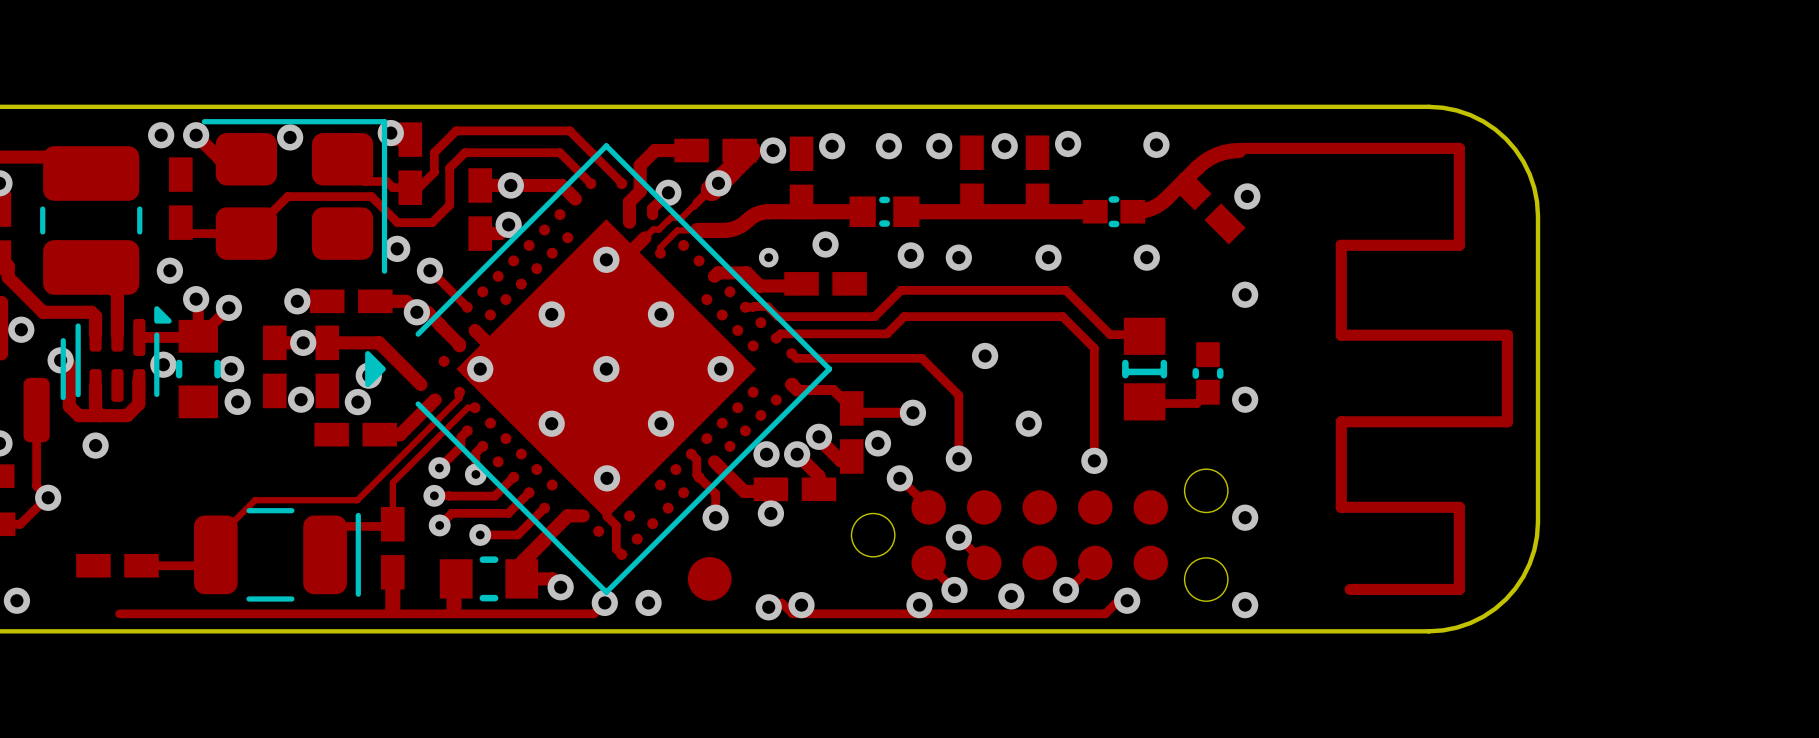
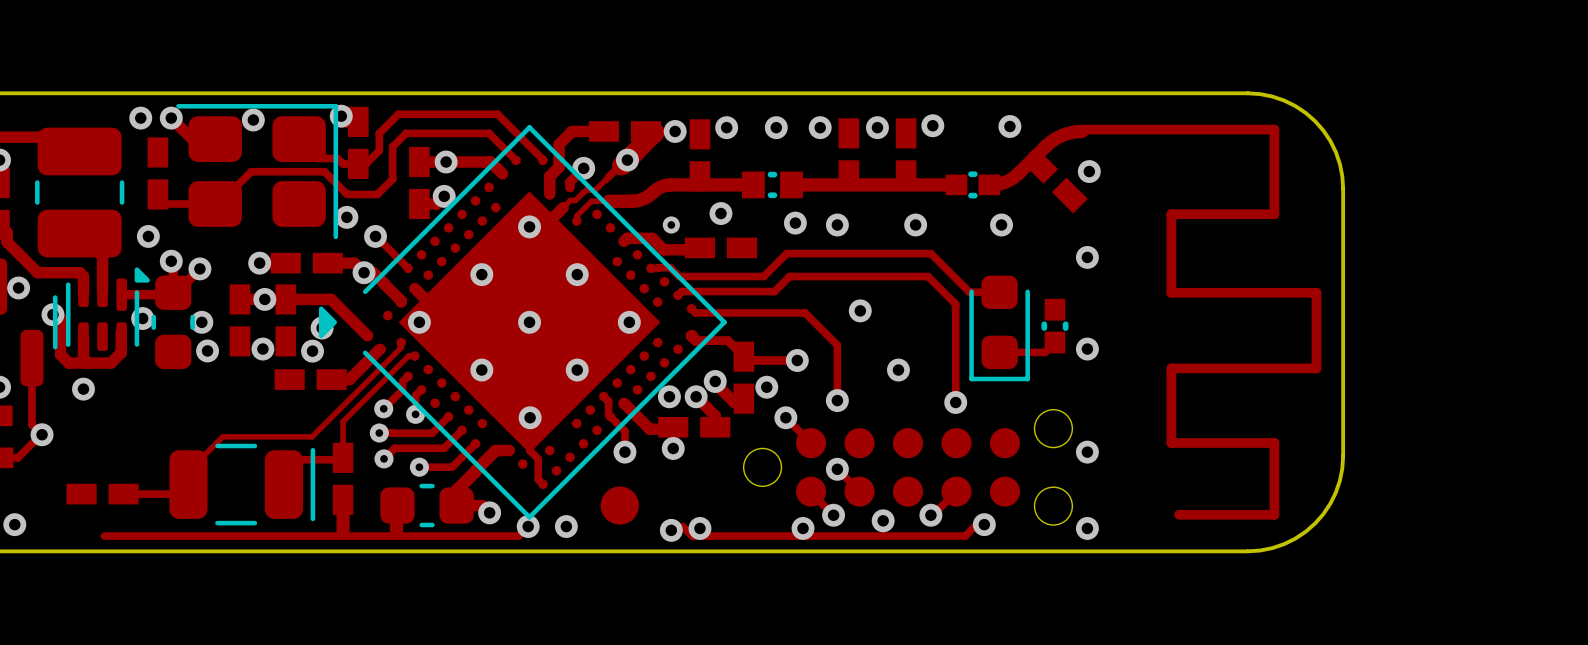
part footprint: [1122, 317, 1168, 421] -> [969, 275, 1030, 382]
part footprint: [175, 319, 221, 419] -> [151, 275, 195, 370]
part footprint: [439, 556, 539, 602] -> [380, 483, 474, 528]

